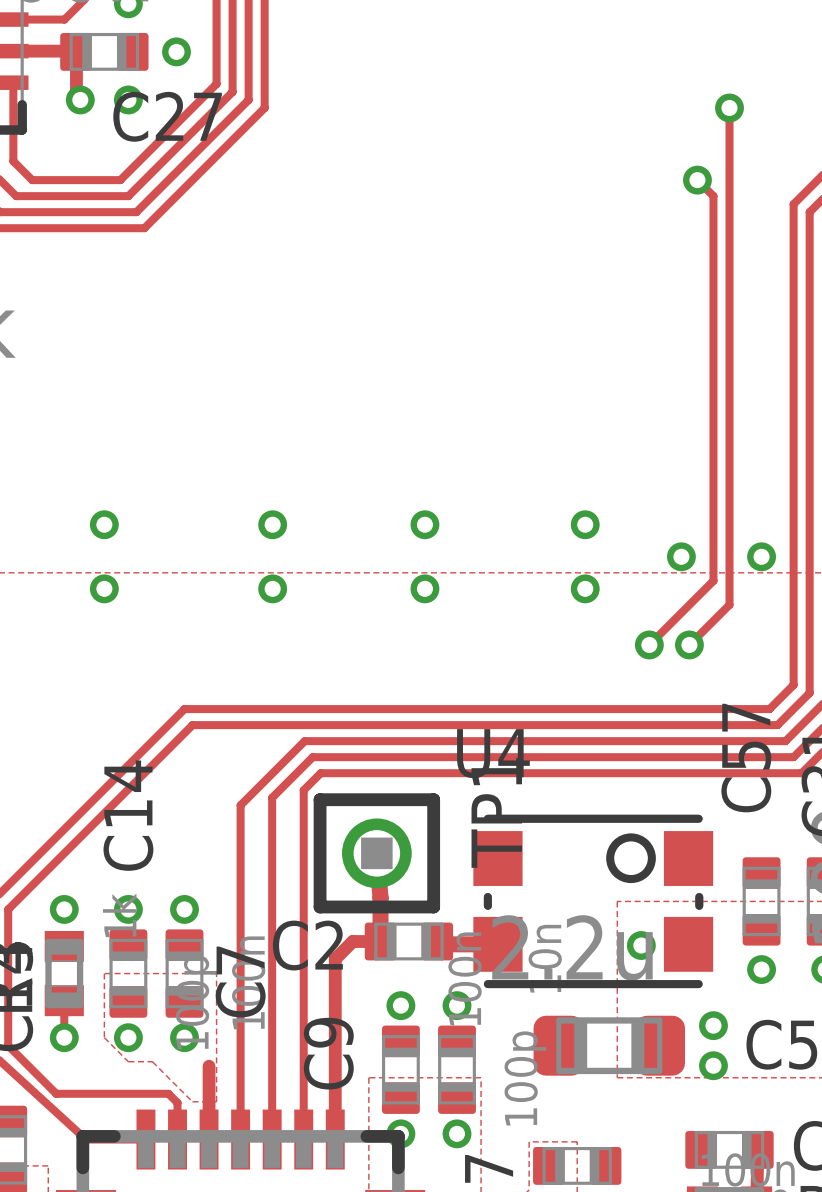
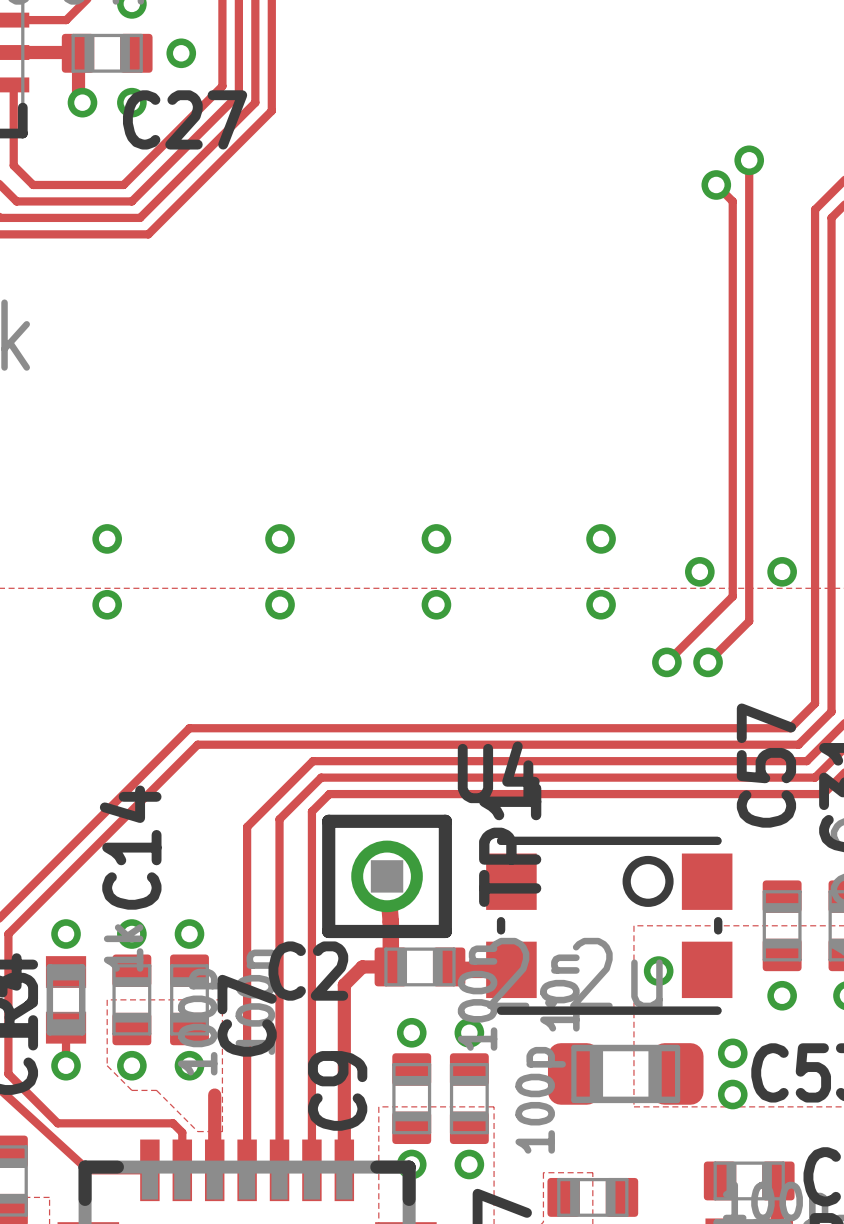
track: (729, 107) (729, 156) -> none
via position: (729, 107) -> (749, 160)

